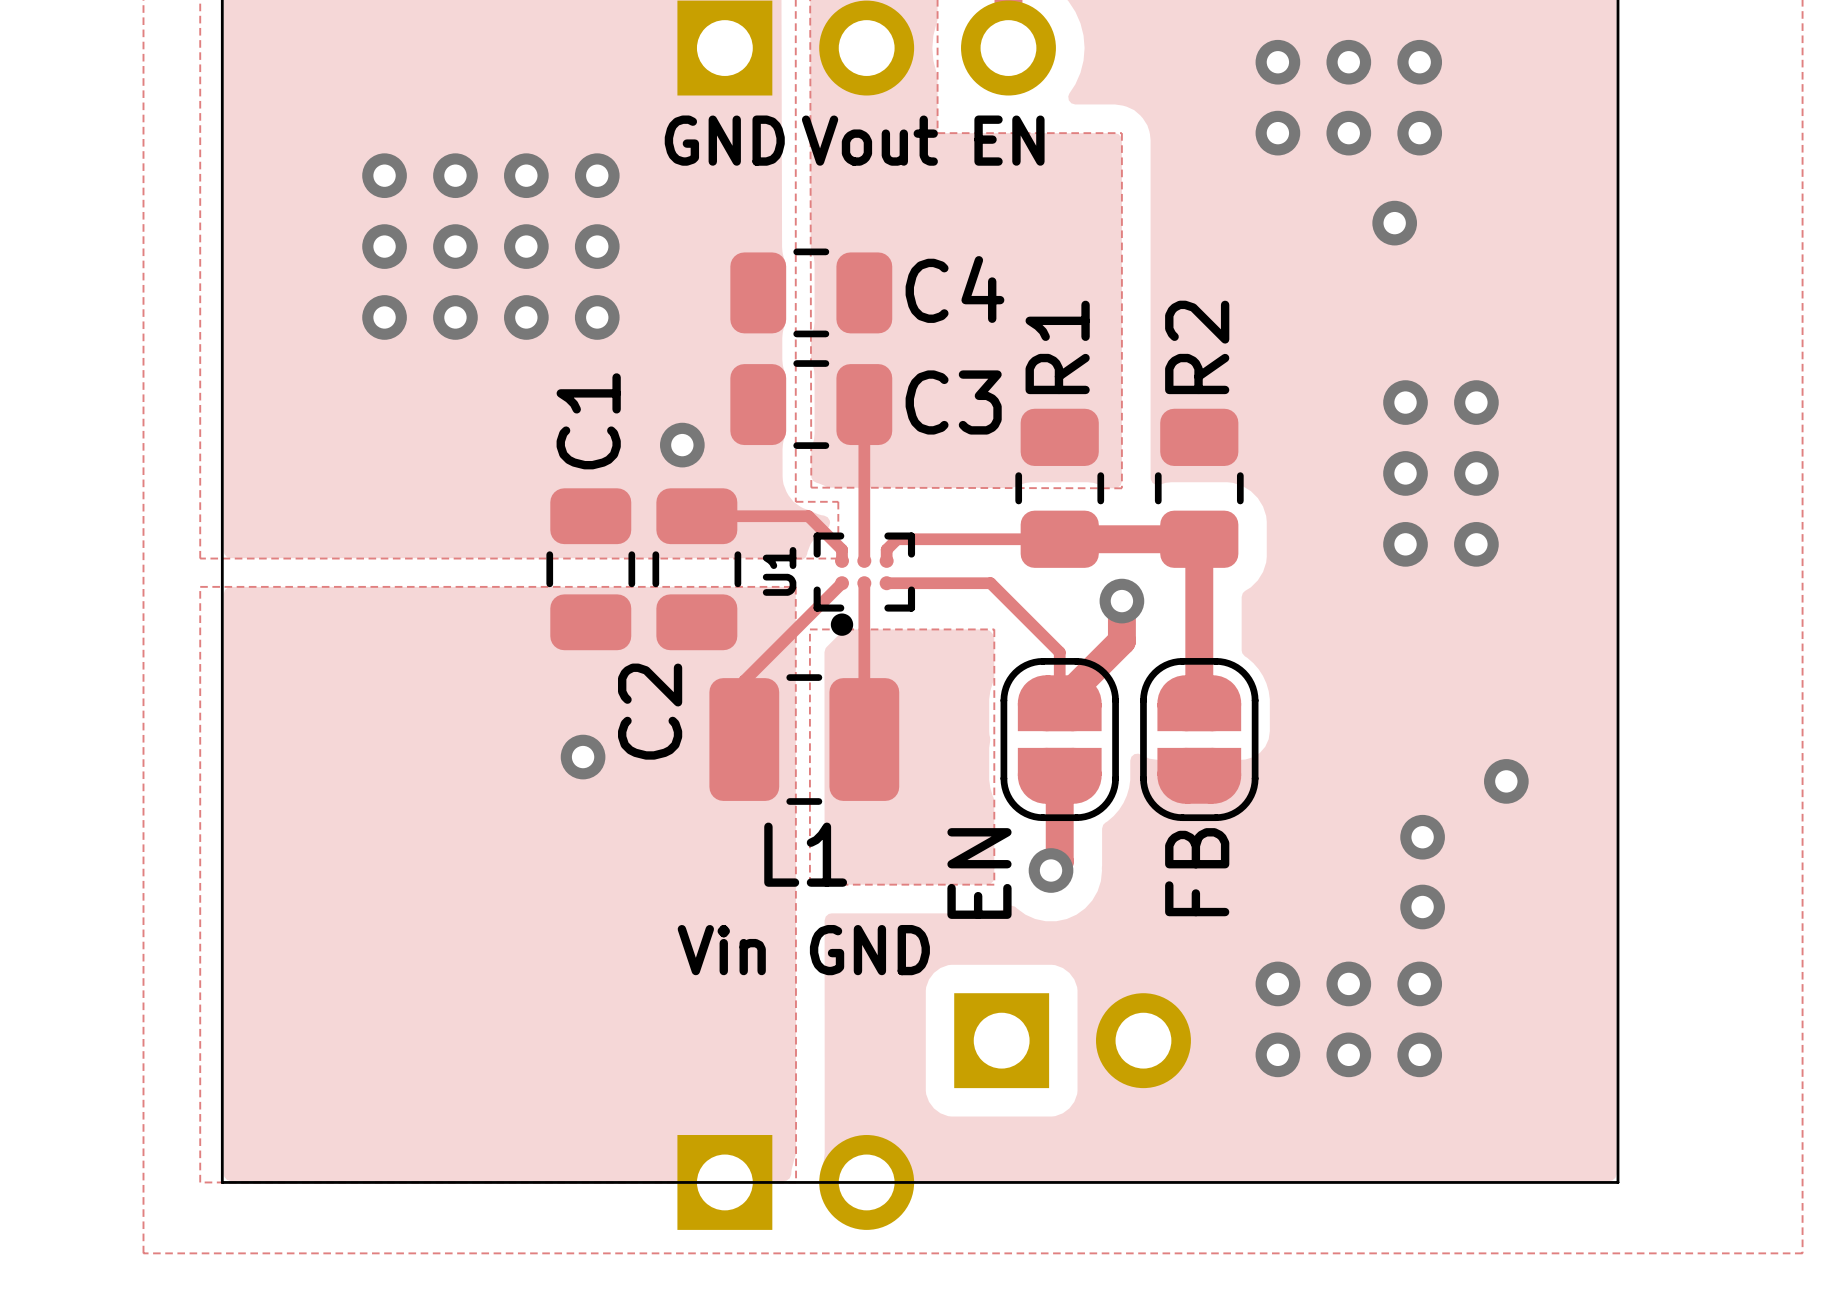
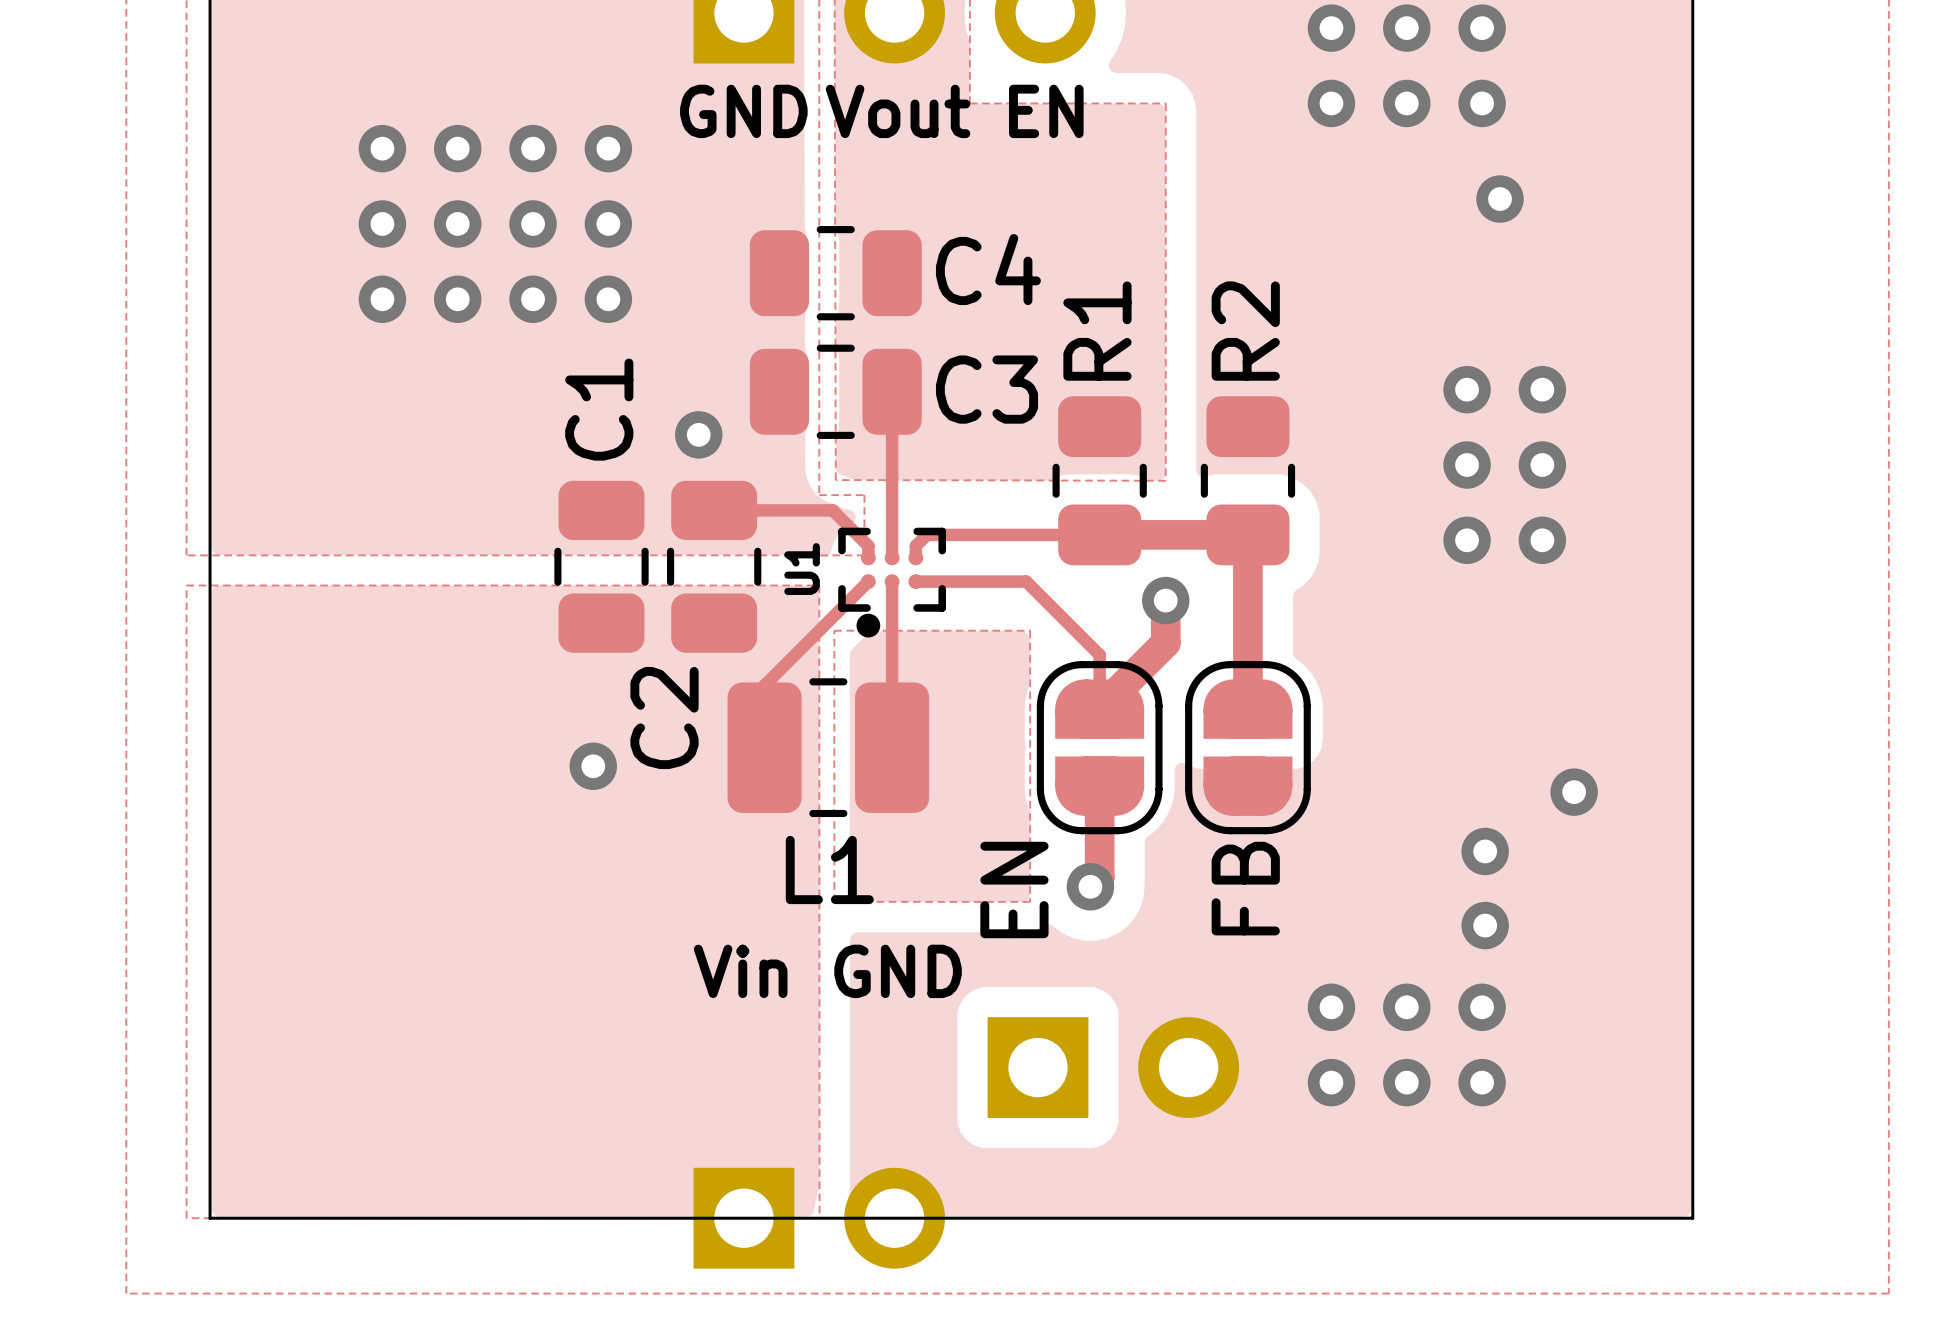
via position: (1394, 223) -> (1500, 199)

